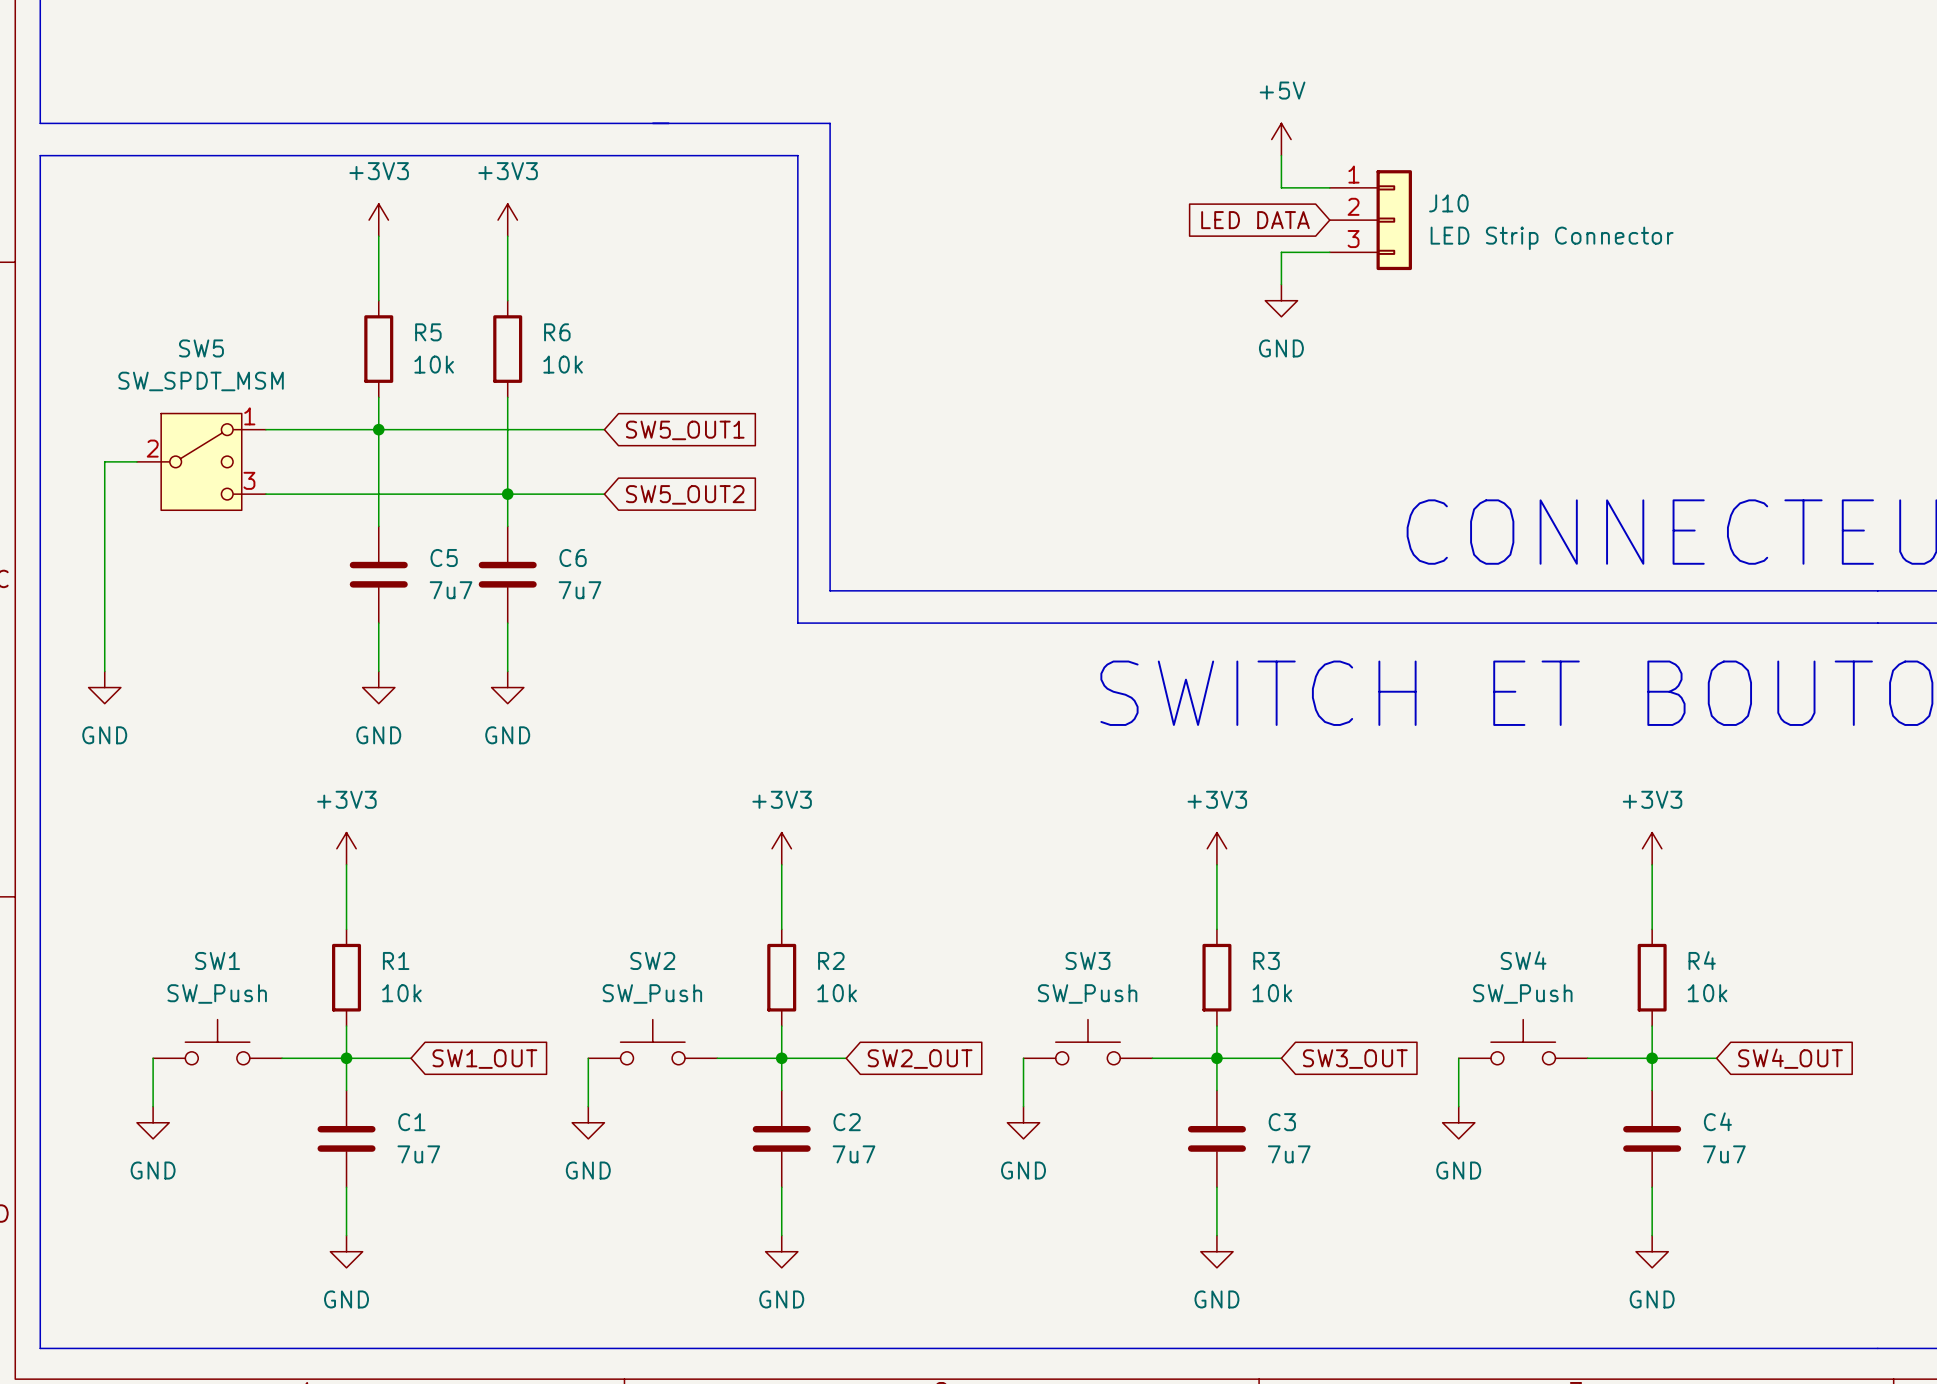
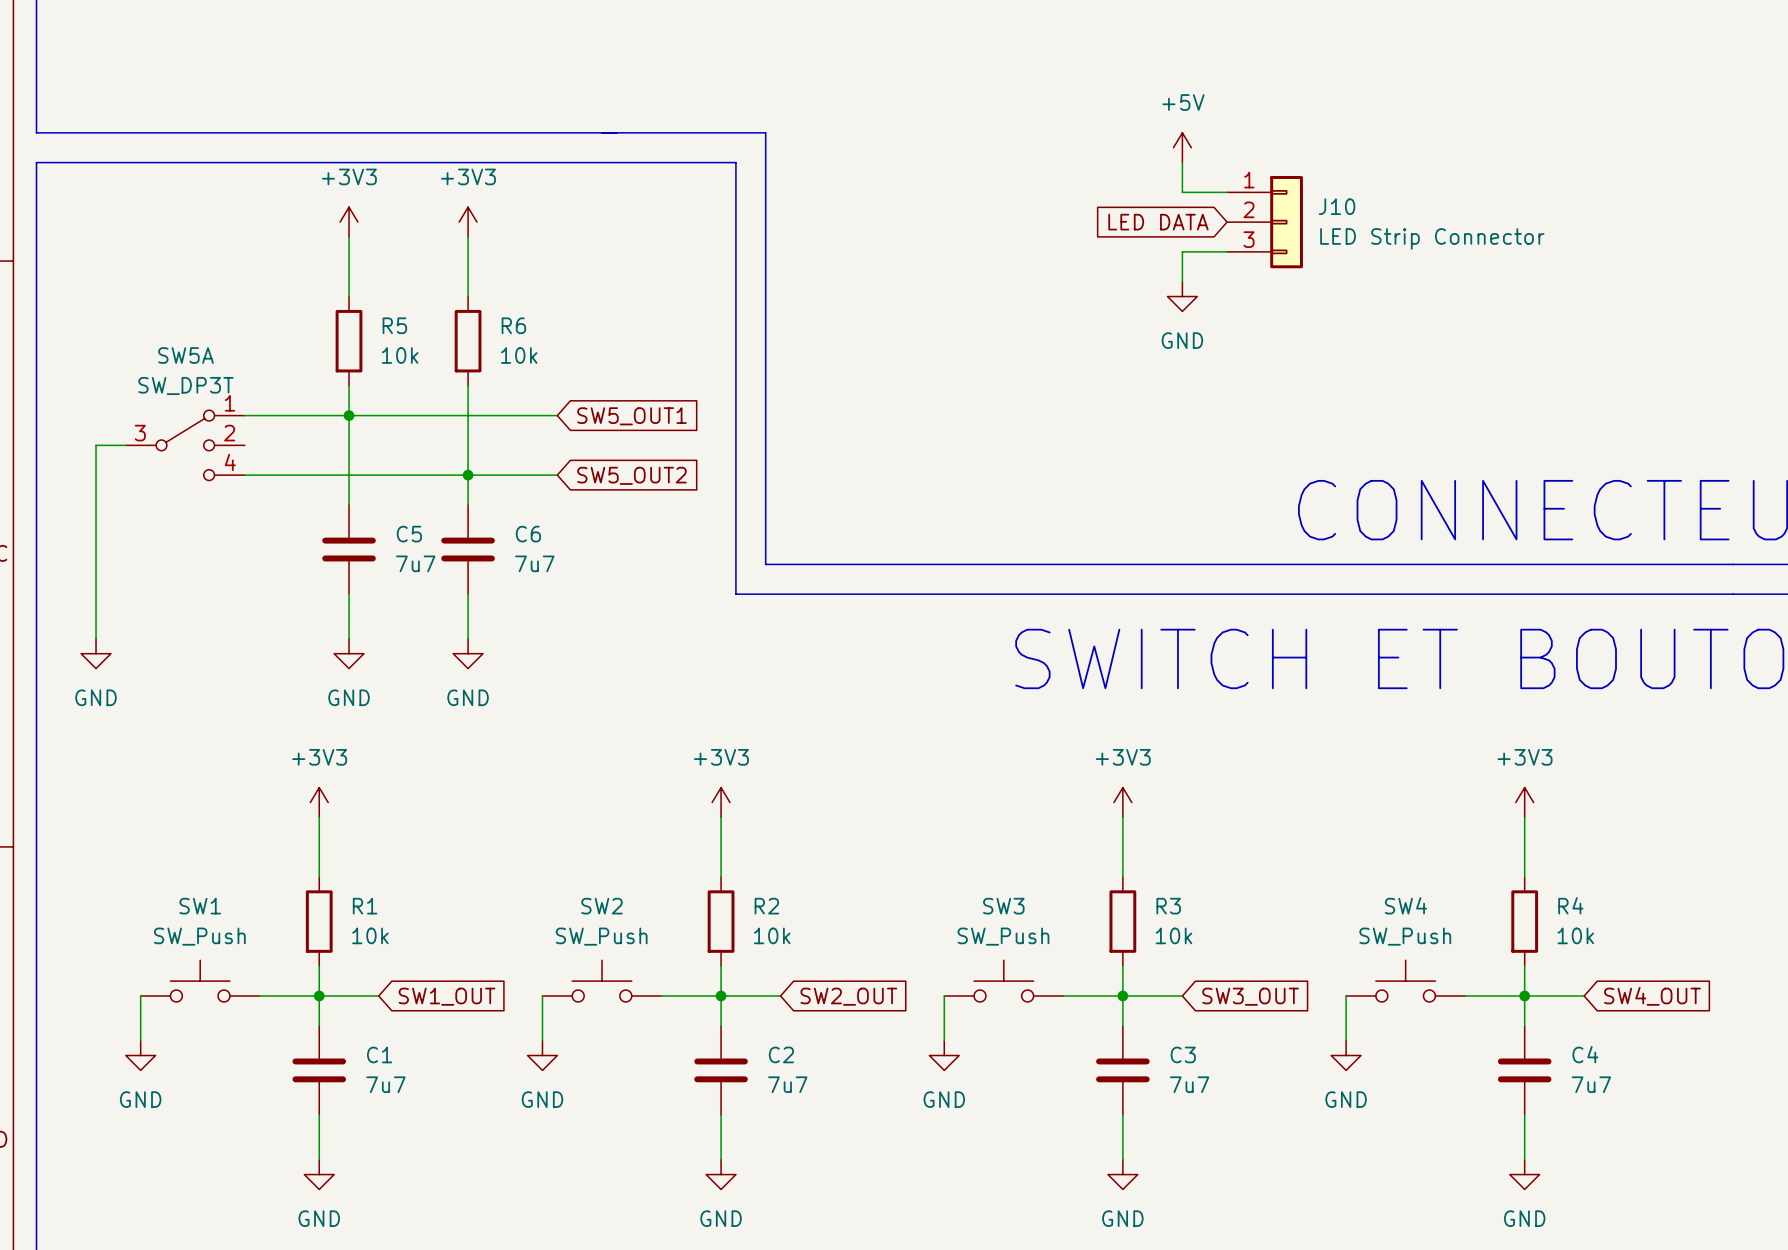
SW5: SW_SPDT_MSM (201, 461) -> none
SW5A: none -> SW_DP3T (185, 445)

